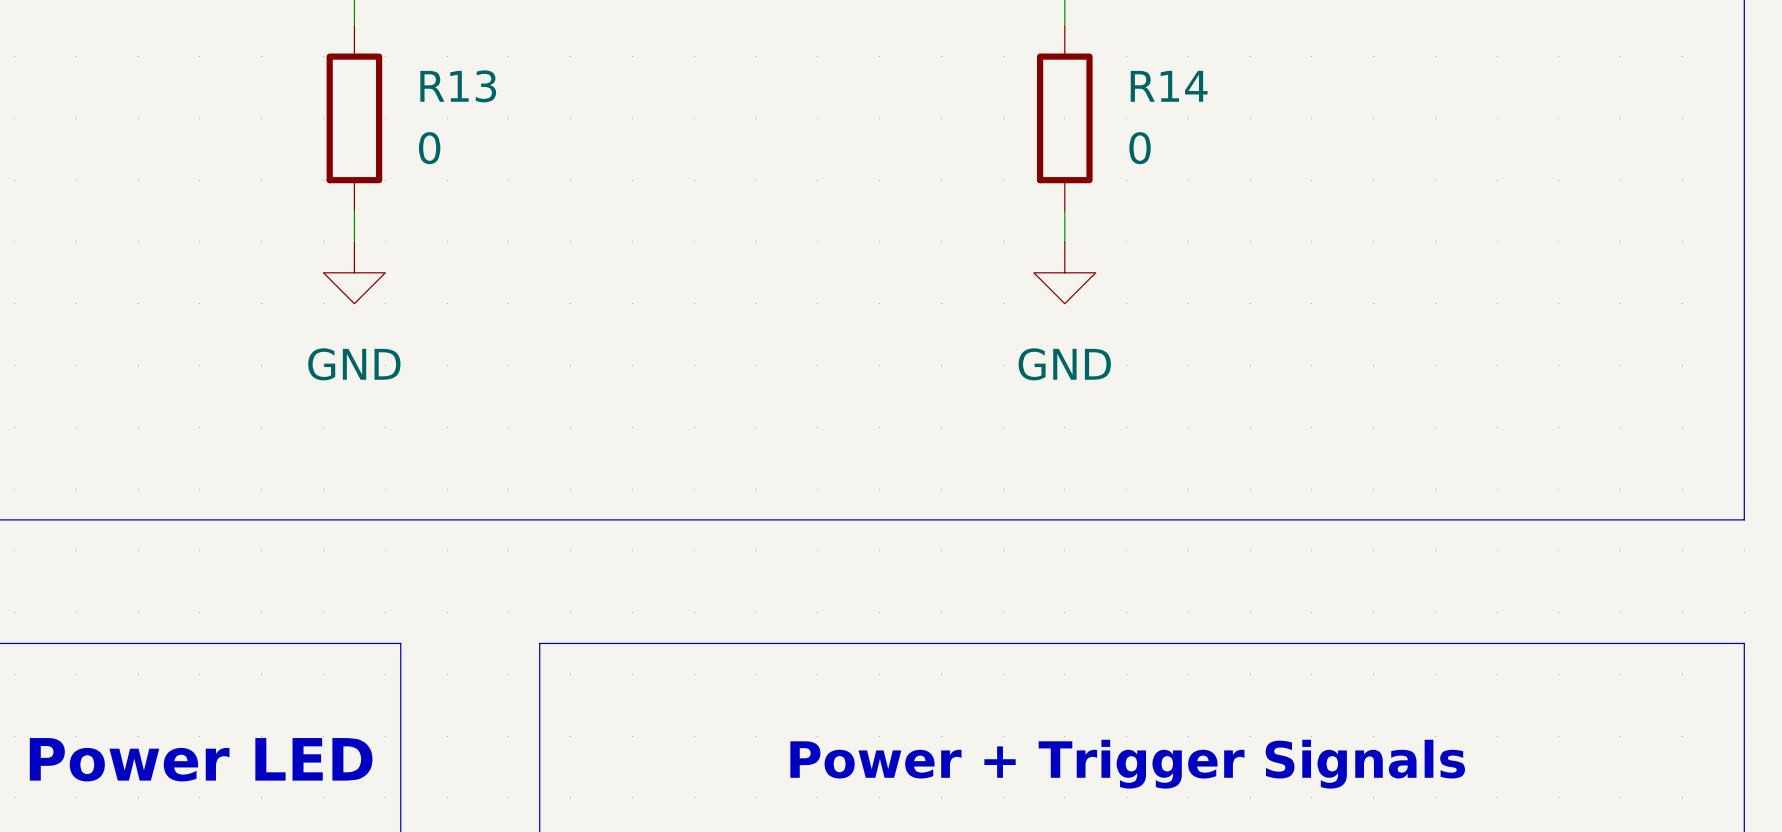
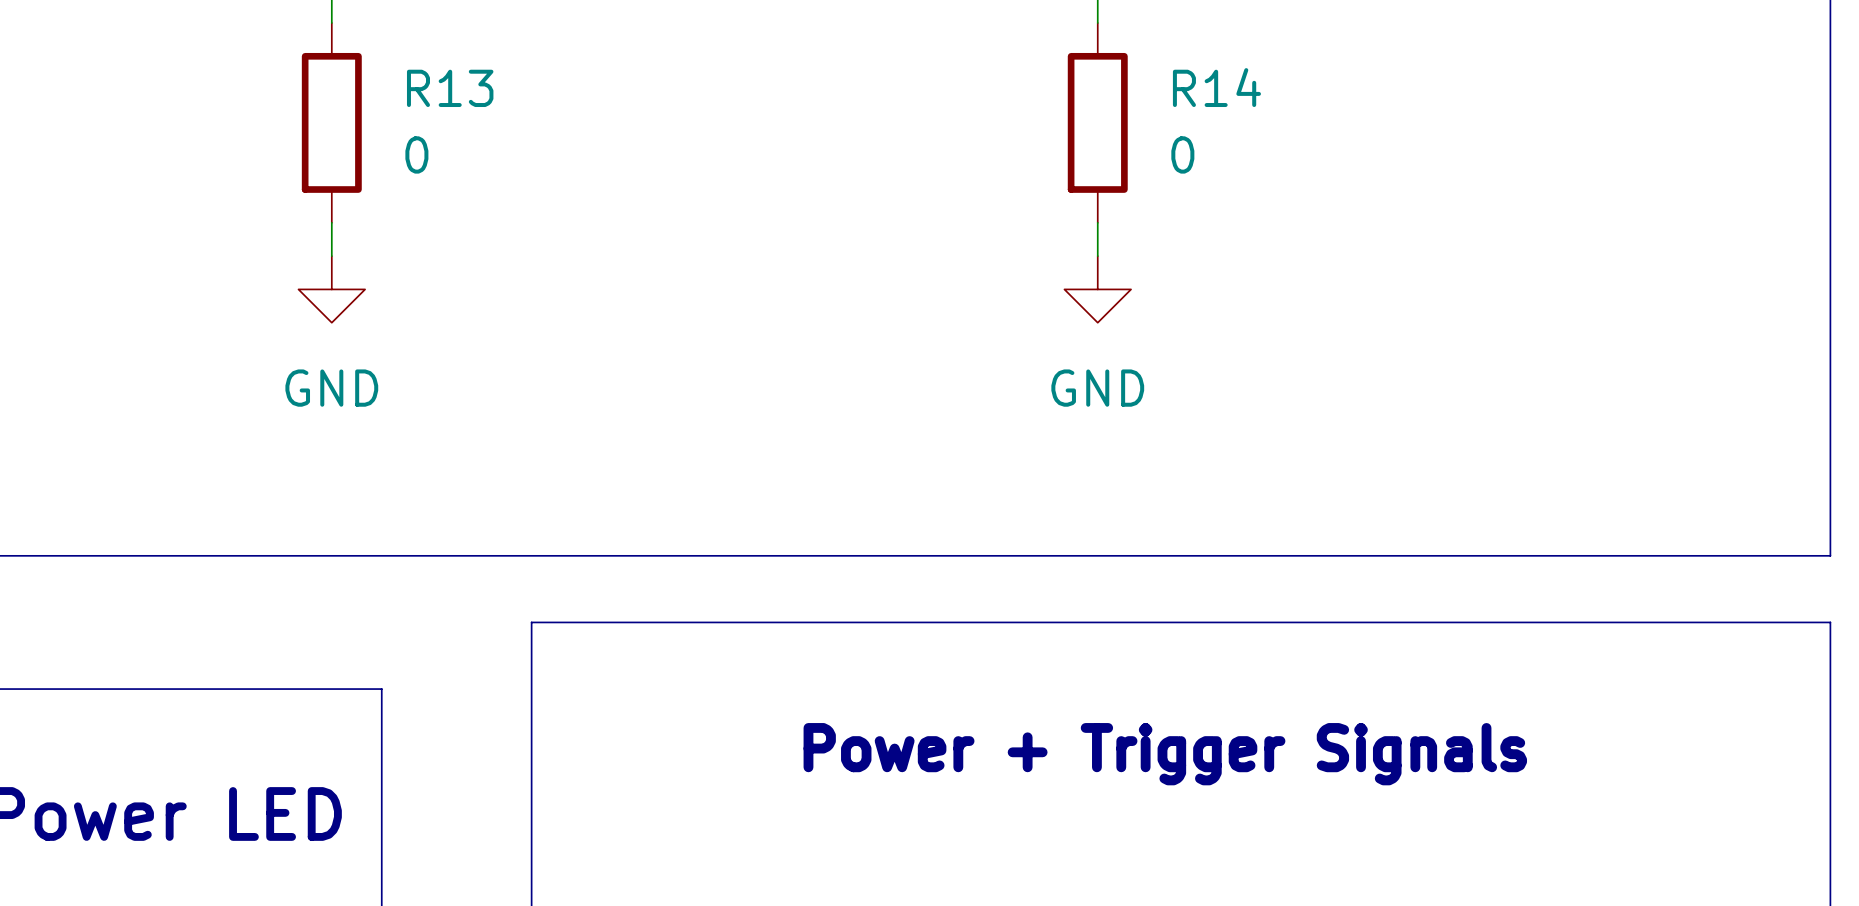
line: (539, 643) (1744, 643) -> (531, 689) (531, 622) (1830, 622) (1830, 689)
text position: Power + Trigger Signals (1127, 764) -> Power + Trigger Signals (1165, 754)

